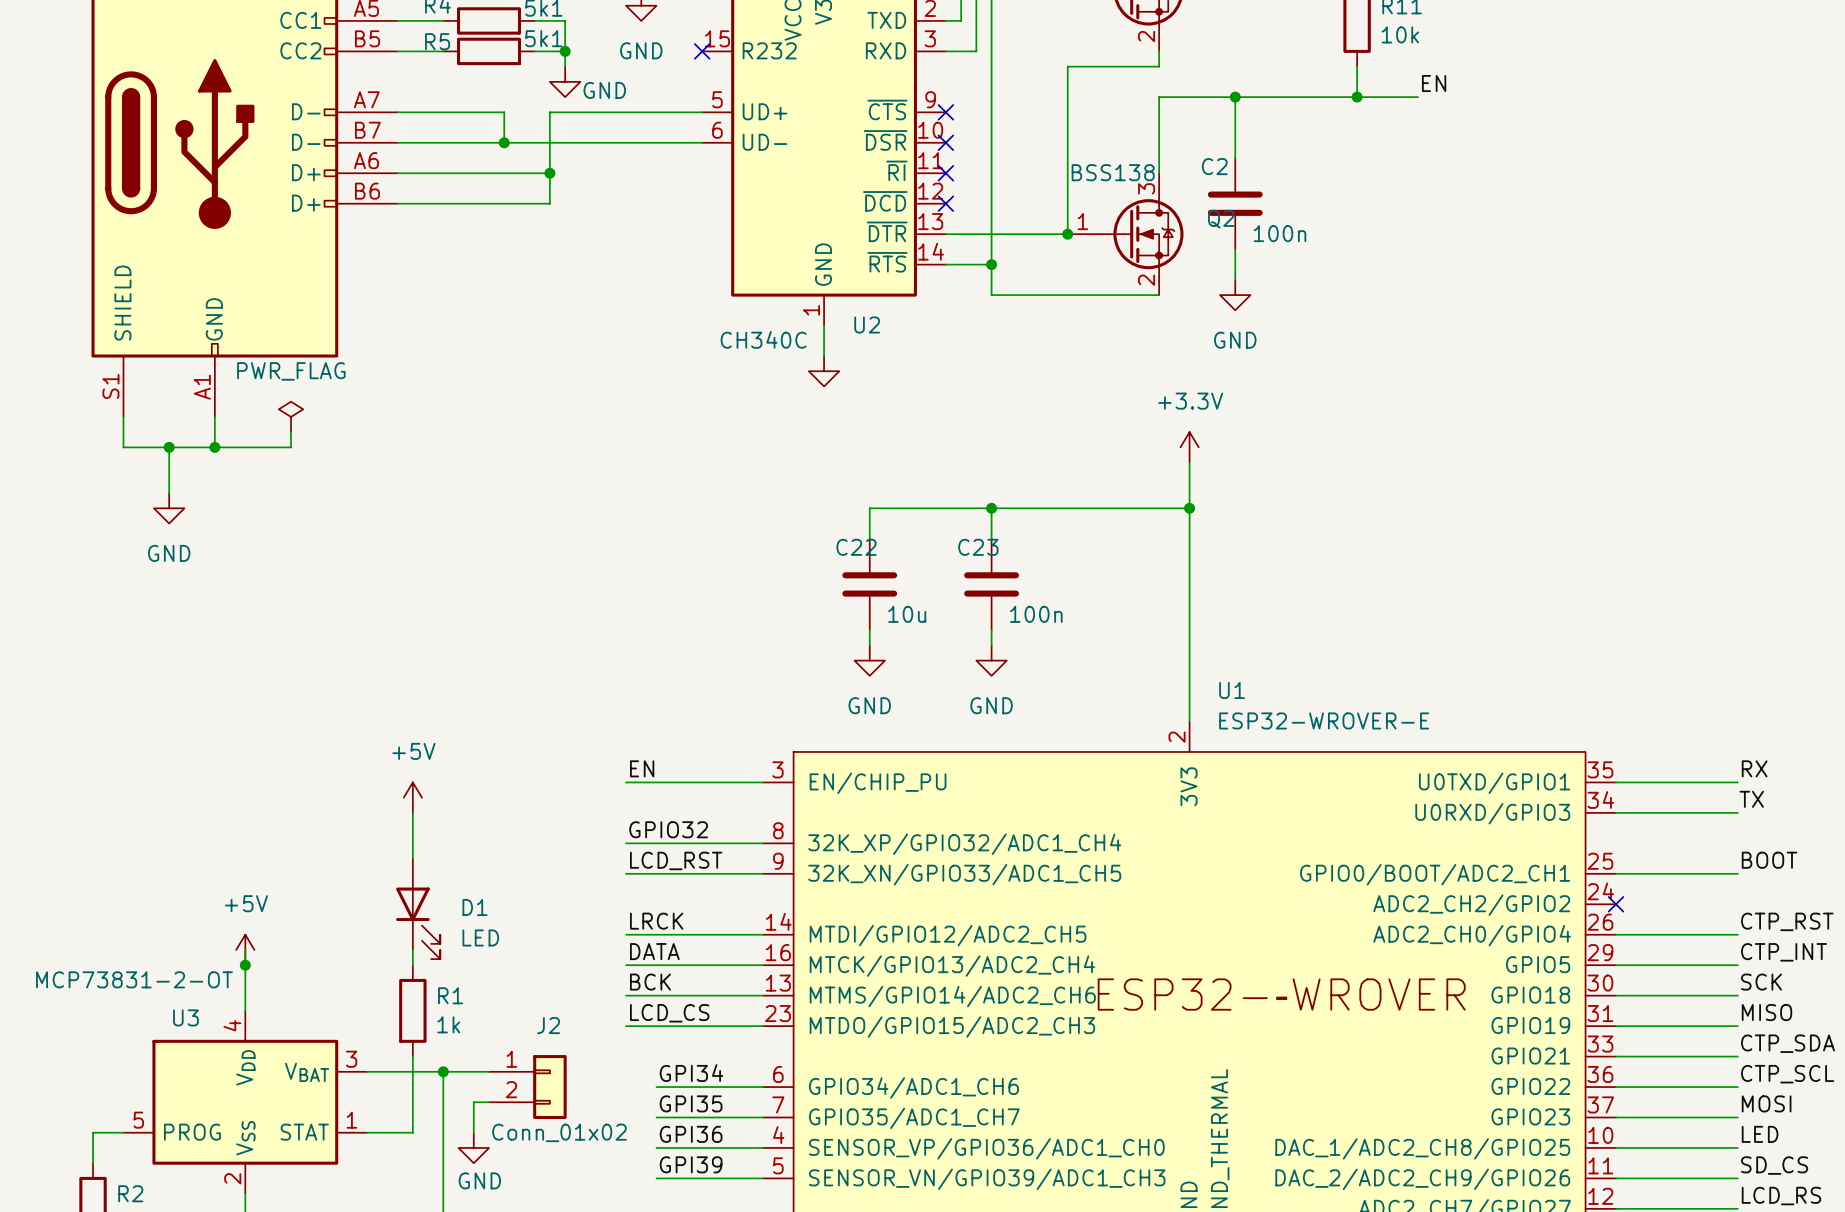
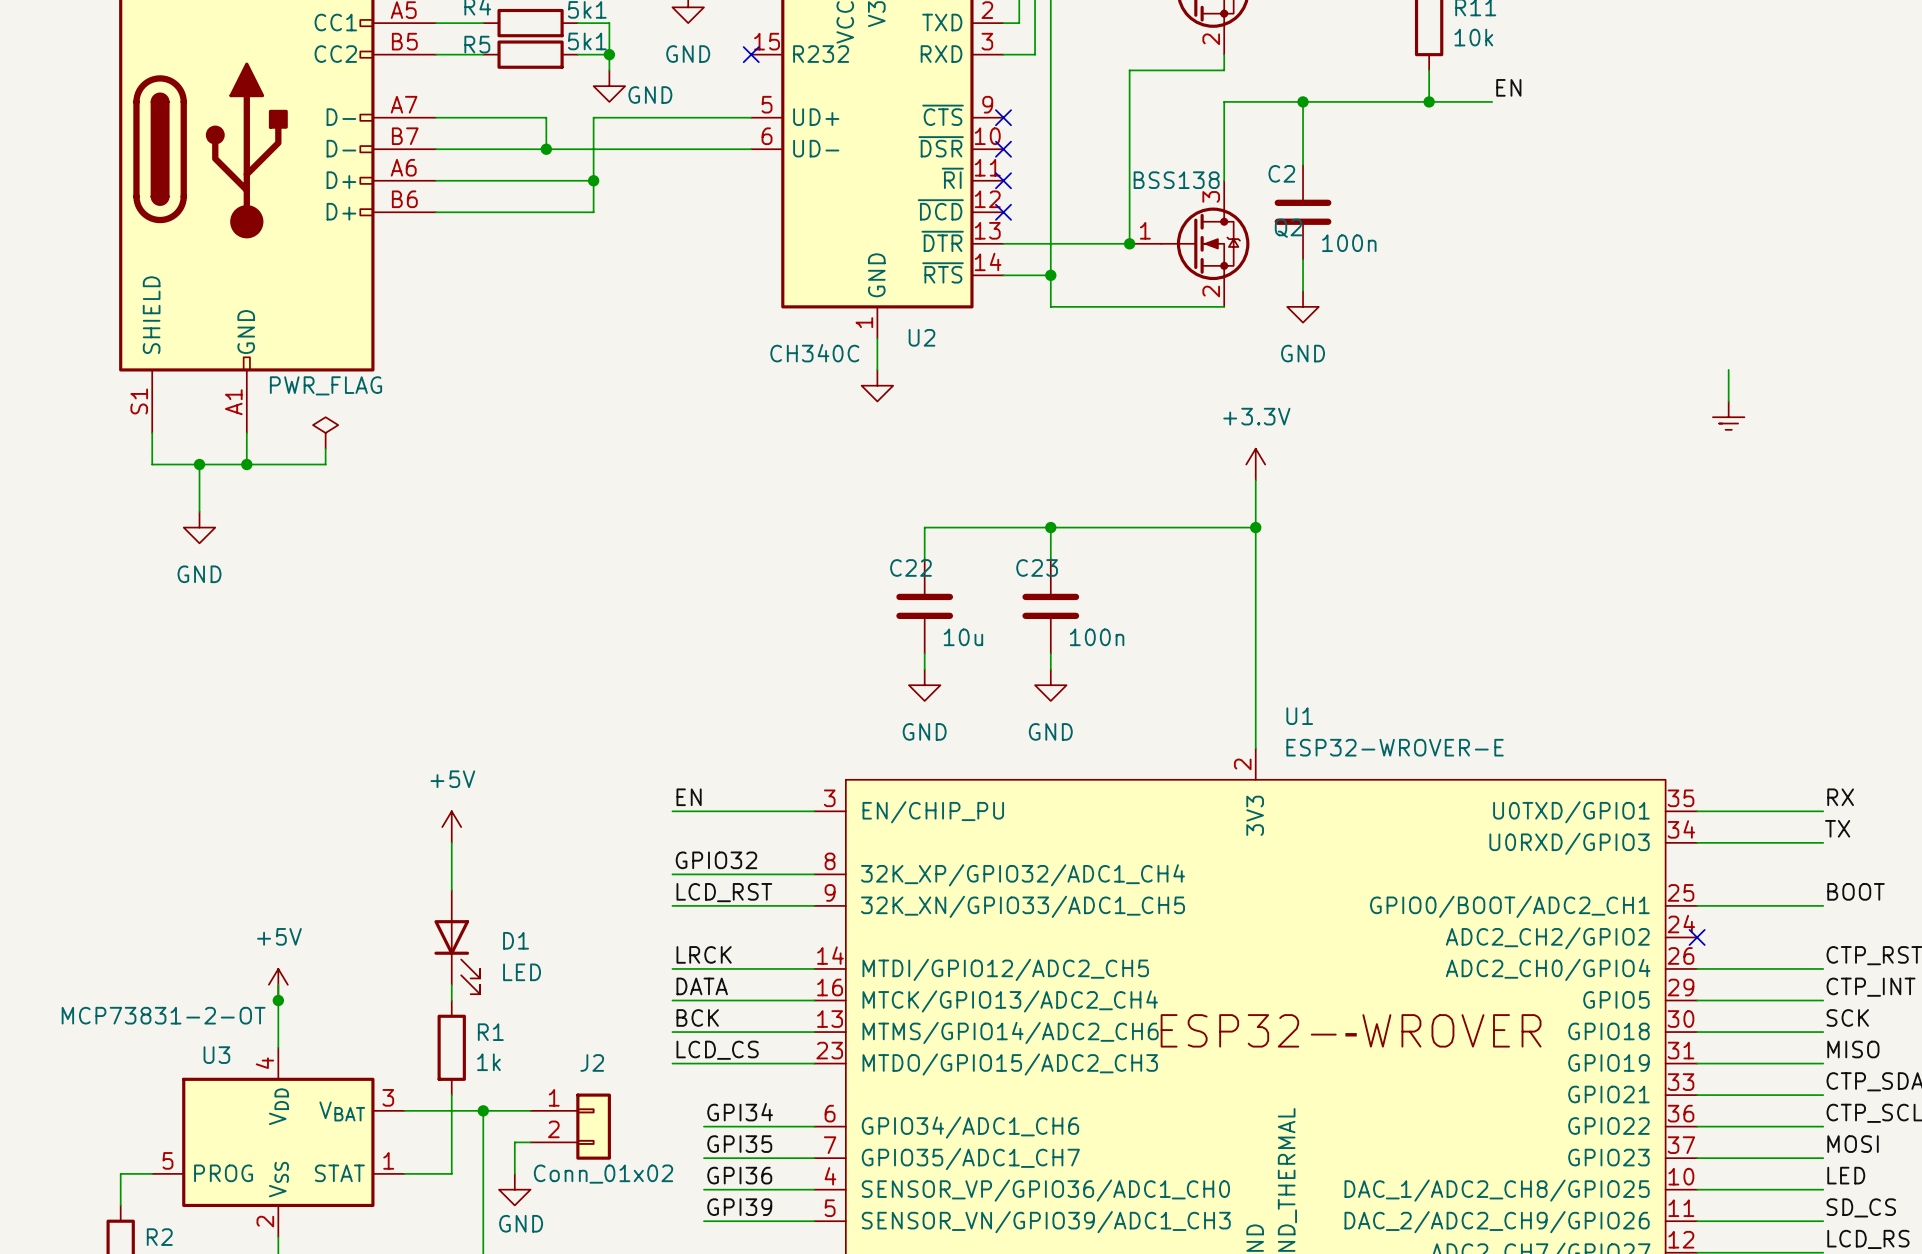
wire: none -> (1728, 369) (1728, 401)
power symbol: none -> (1728, 415)

